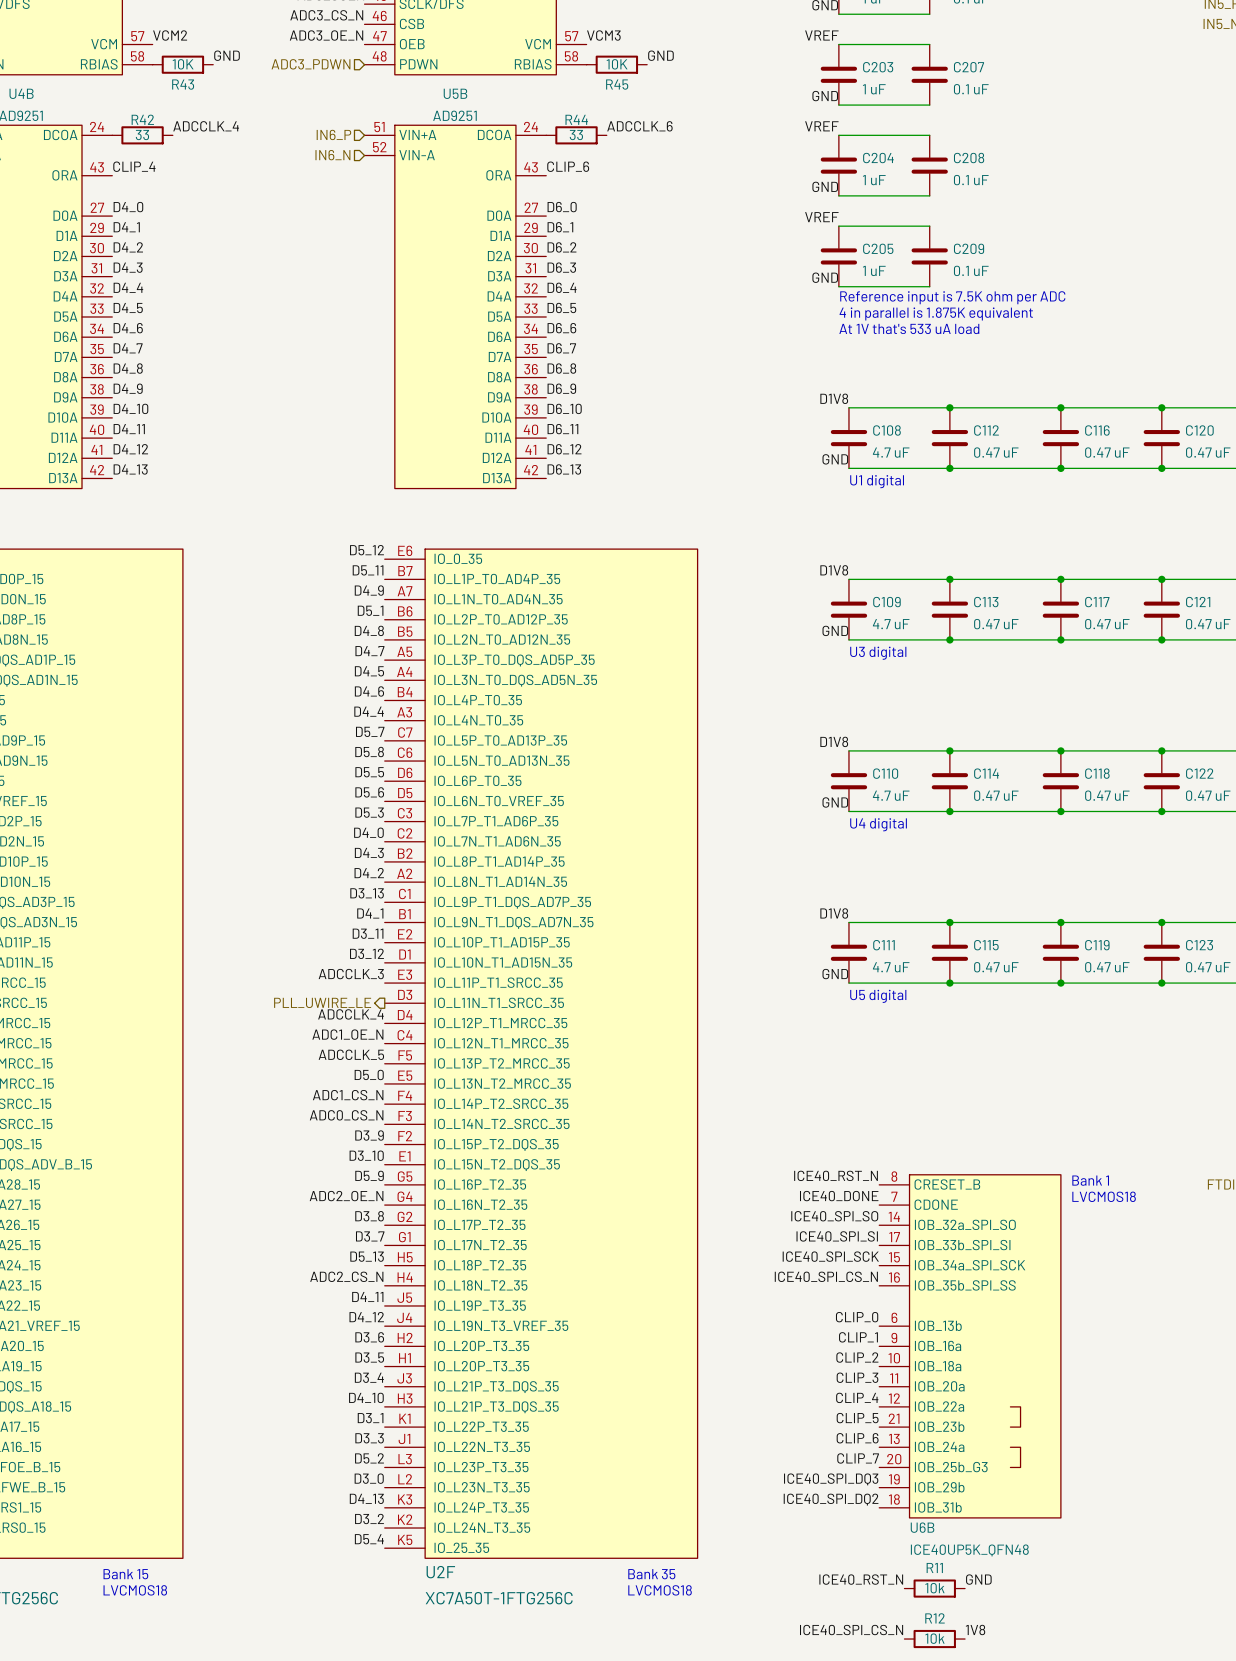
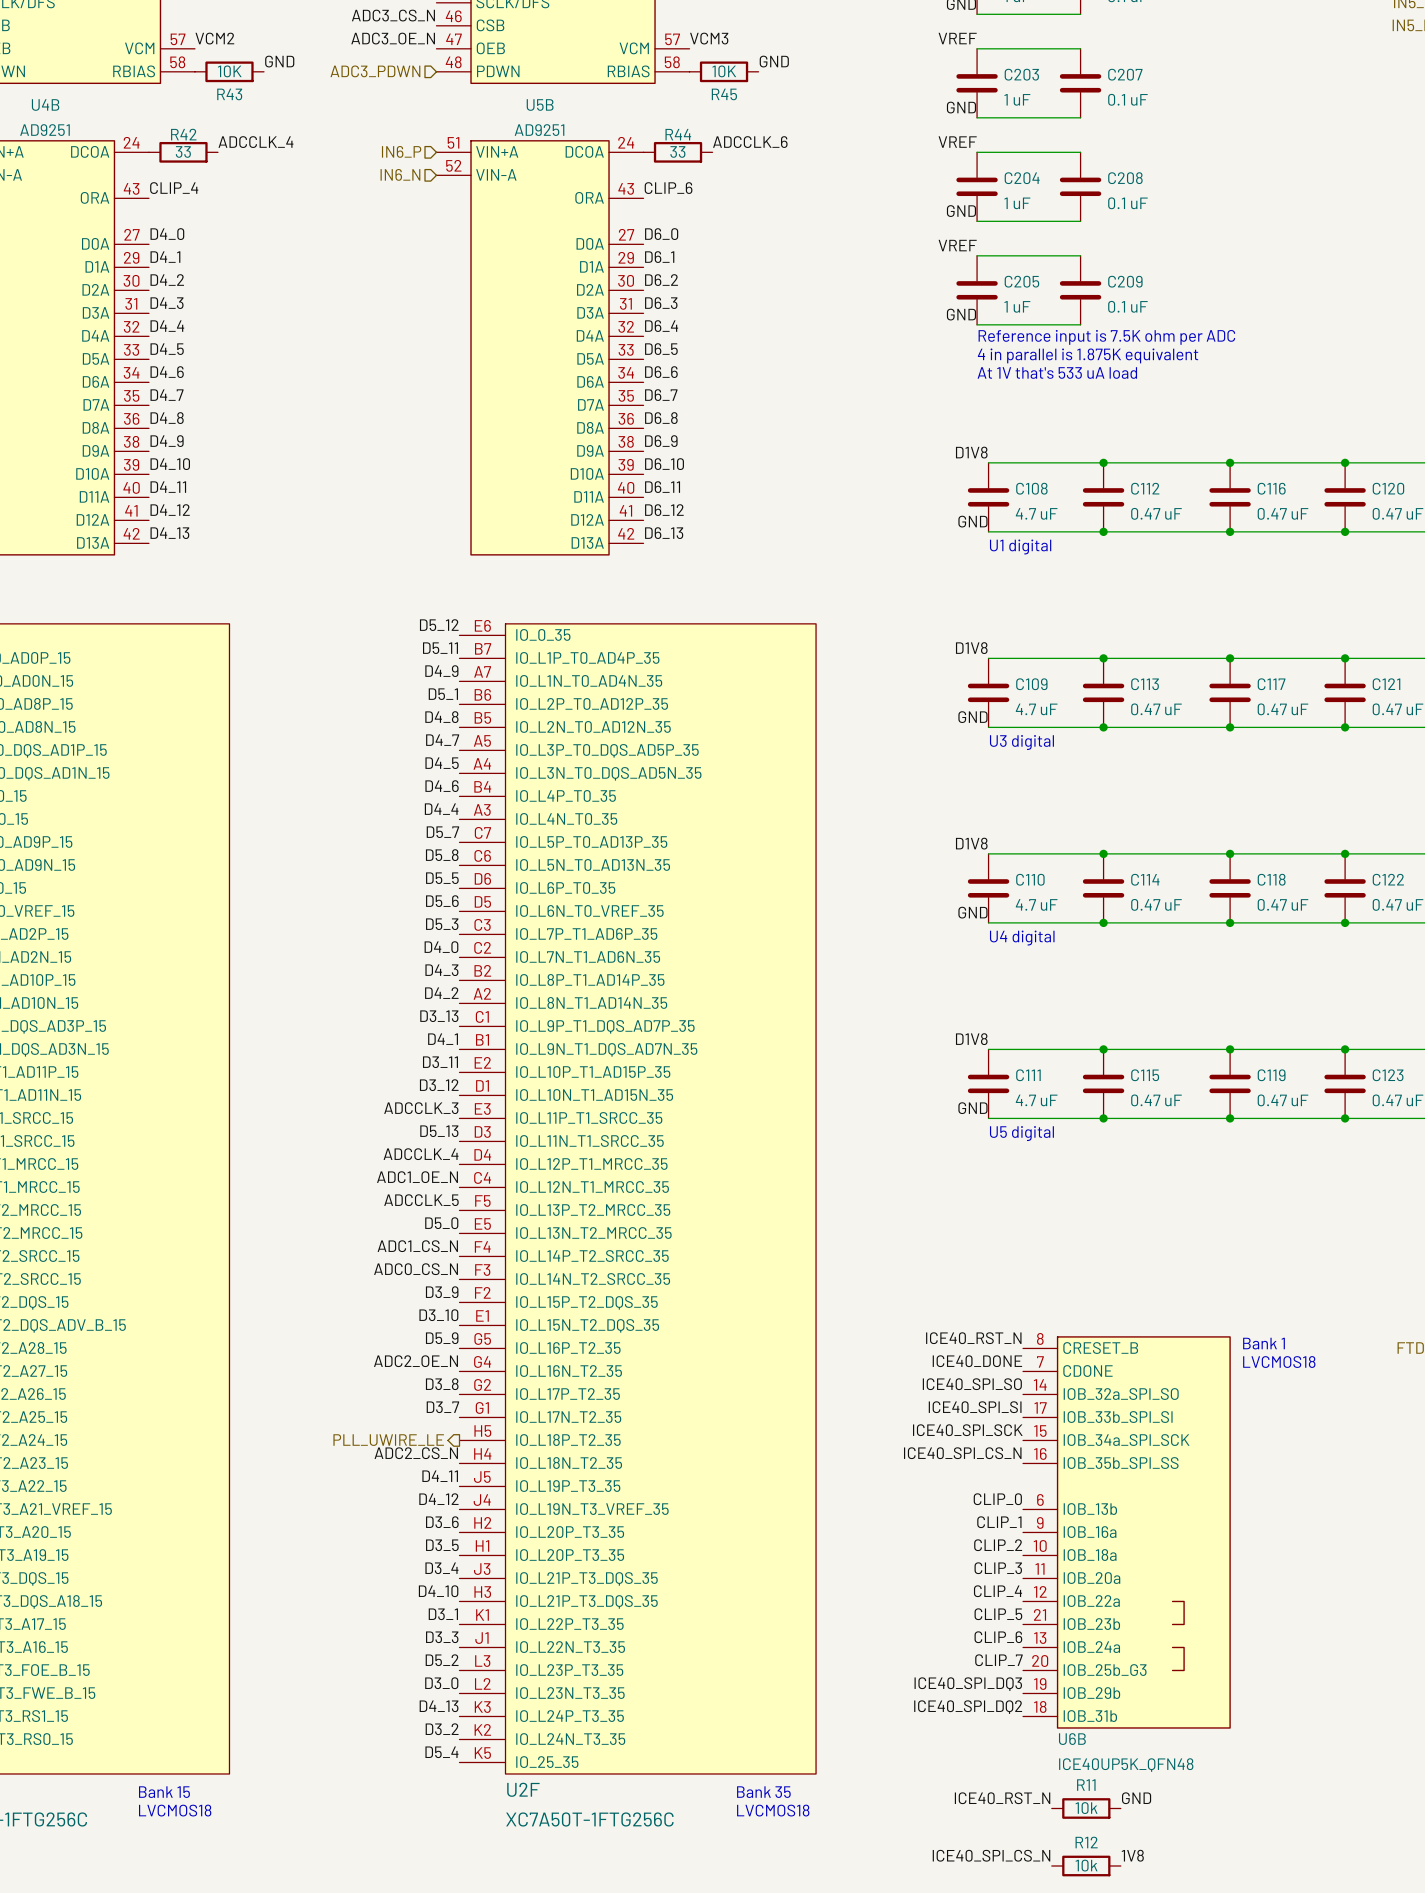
label: none -> D5_13 (439, 1131)
hierarchical label: PLL_UWIRE_LE (322, 1002) -> none
label: D5_13 (367, 1256) -> none
hierarchical label: none -> PLL_UWIRE_LE (388, 1440)

